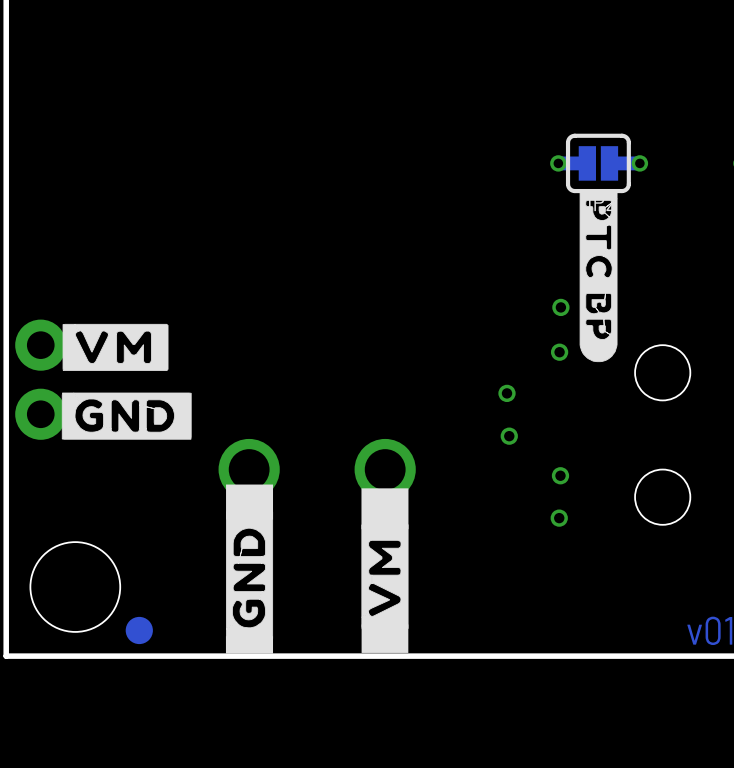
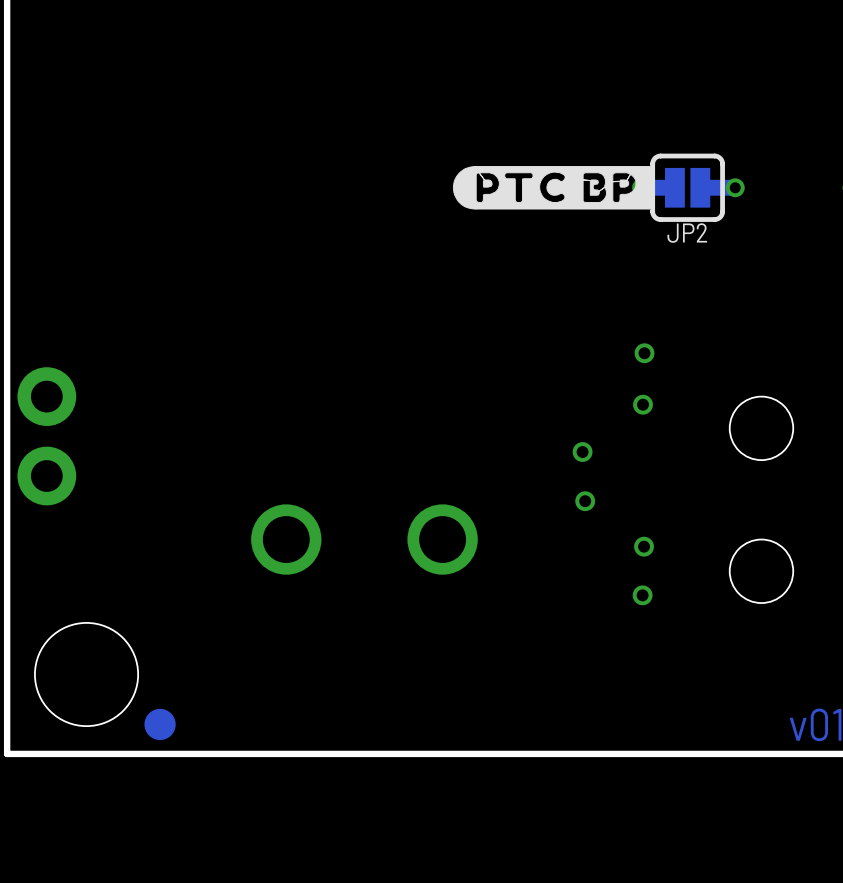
drawing: none -> [452, 166, 652, 210]
drawing: [579, 189, 618, 363] -> none
drawing: [61, 323, 192, 440] -> none
drawing: [225, 484, 274, 654] -> none
drawing: [361, 488, 409, 653] -> none

